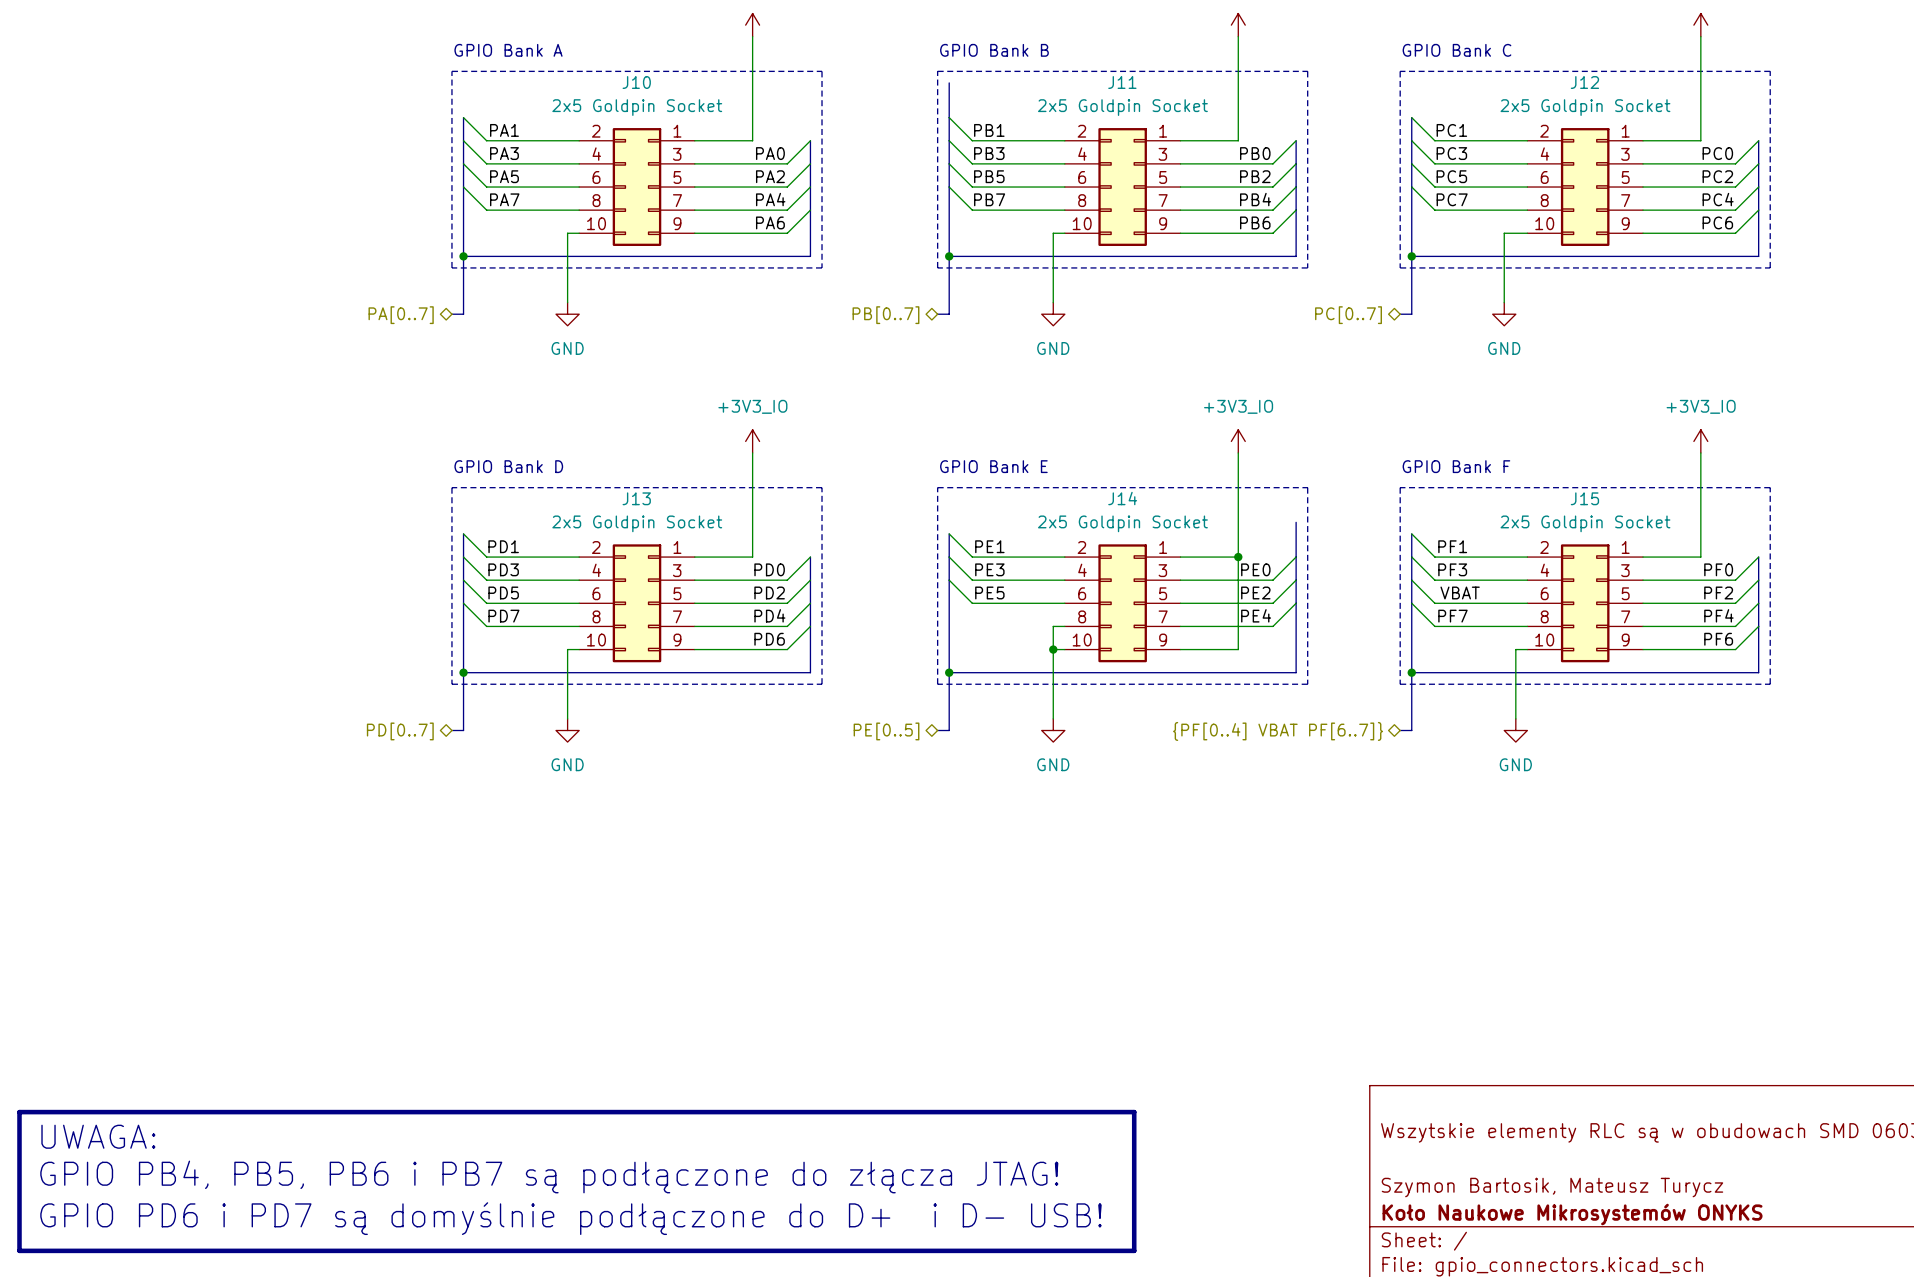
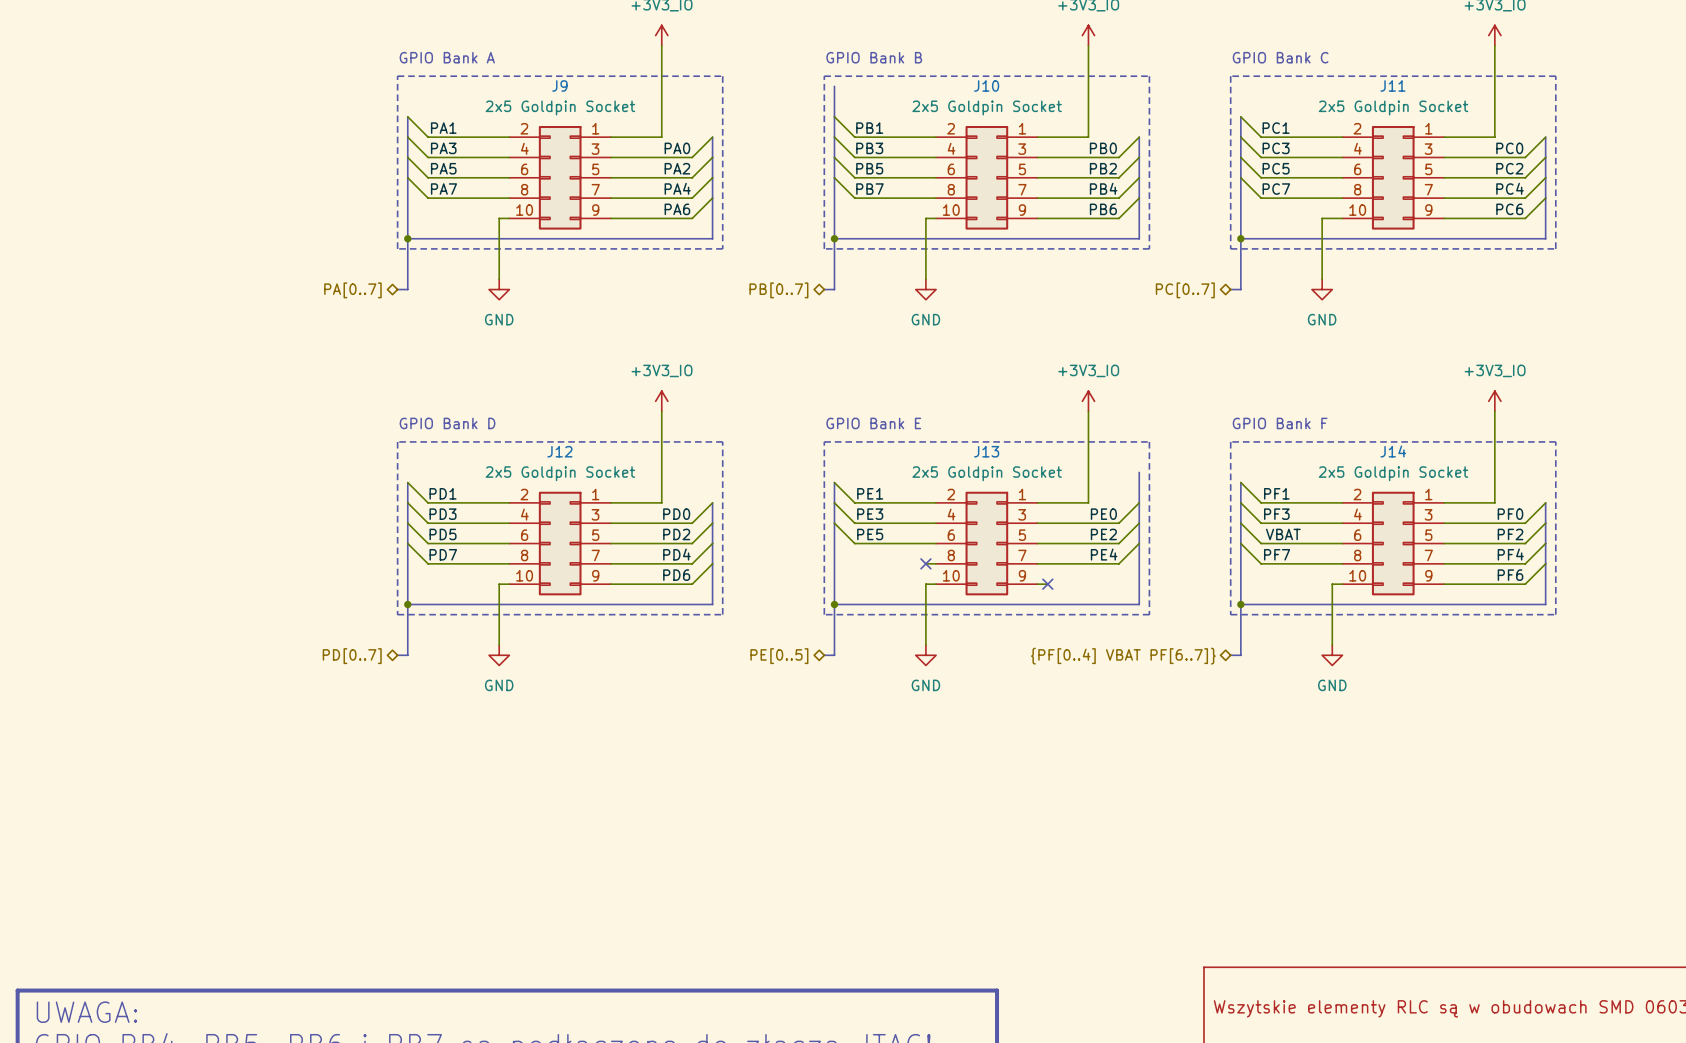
J10 name: J10 (636, 82) -> J9 (559, 85)
J11 name: J11 (1122, 82) -> J10 (986, 85)
J12 name: J12 (1584, 82) -> J11 (1393, 85)
J13 name: J13 (636, 498) -> J12 (559, 451)
J14 name: J14 (1122, 498) -> J13 (986, 451)
J15 name: J15 (1584, 498) -> J14 (1393, 451)
wire: (1238, 557) (1238, 649) (1192, 649) -> none
junction: (1238, 557) -> none
wire: (1053, 626) (1053, 649) -> none
no-connect mark: none -> (925, 563)
junction: (1053, 649) -> none
no-connect mark: none -> (1047, 584)

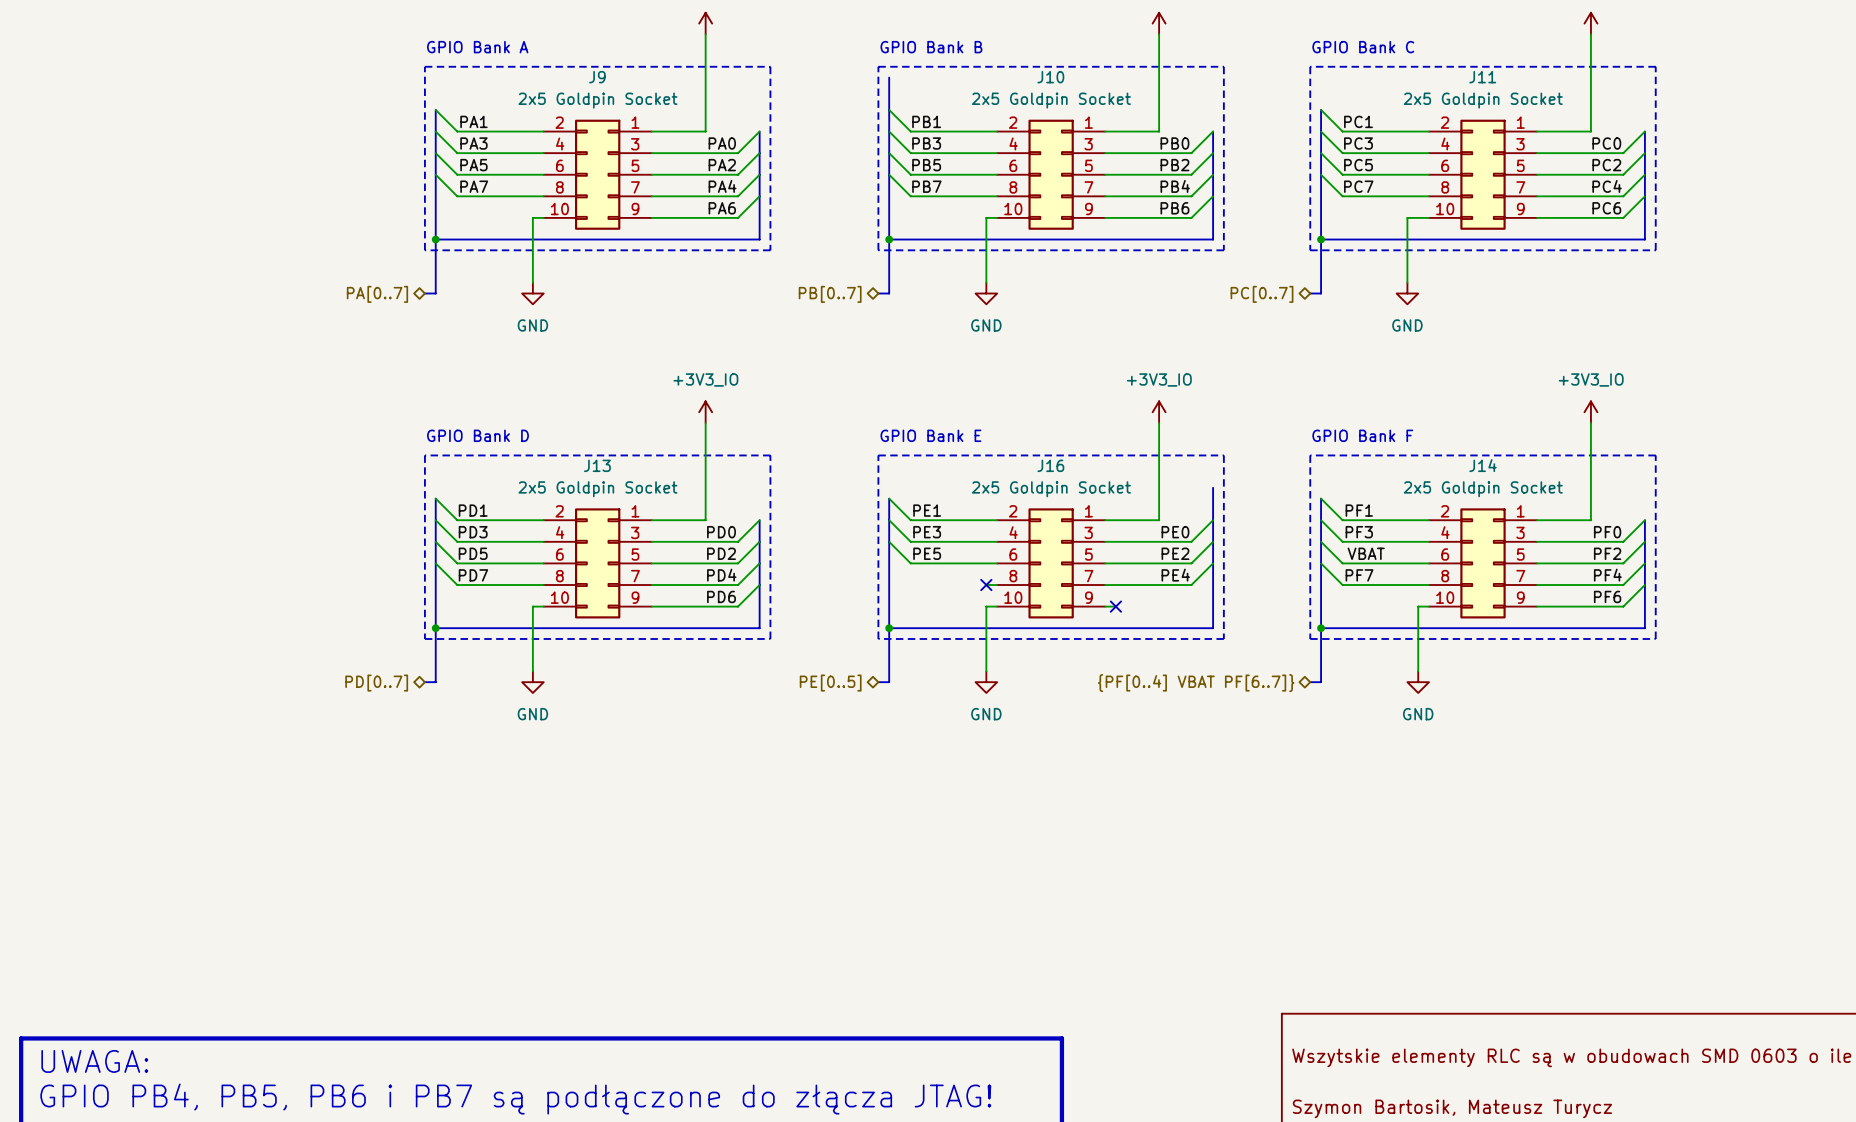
J12 name: J12 (559, 451) -> J13 (597, 465)
J13 name: J13 (986, 451) -> J16 (1050, 465)

